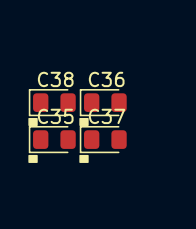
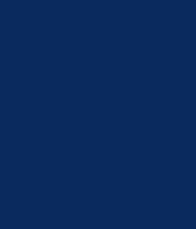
C38: (52, 107) -> none
C36: (103, 107) -> none
C35: (52, 144) -> none
C37: (103, 144) -> none

